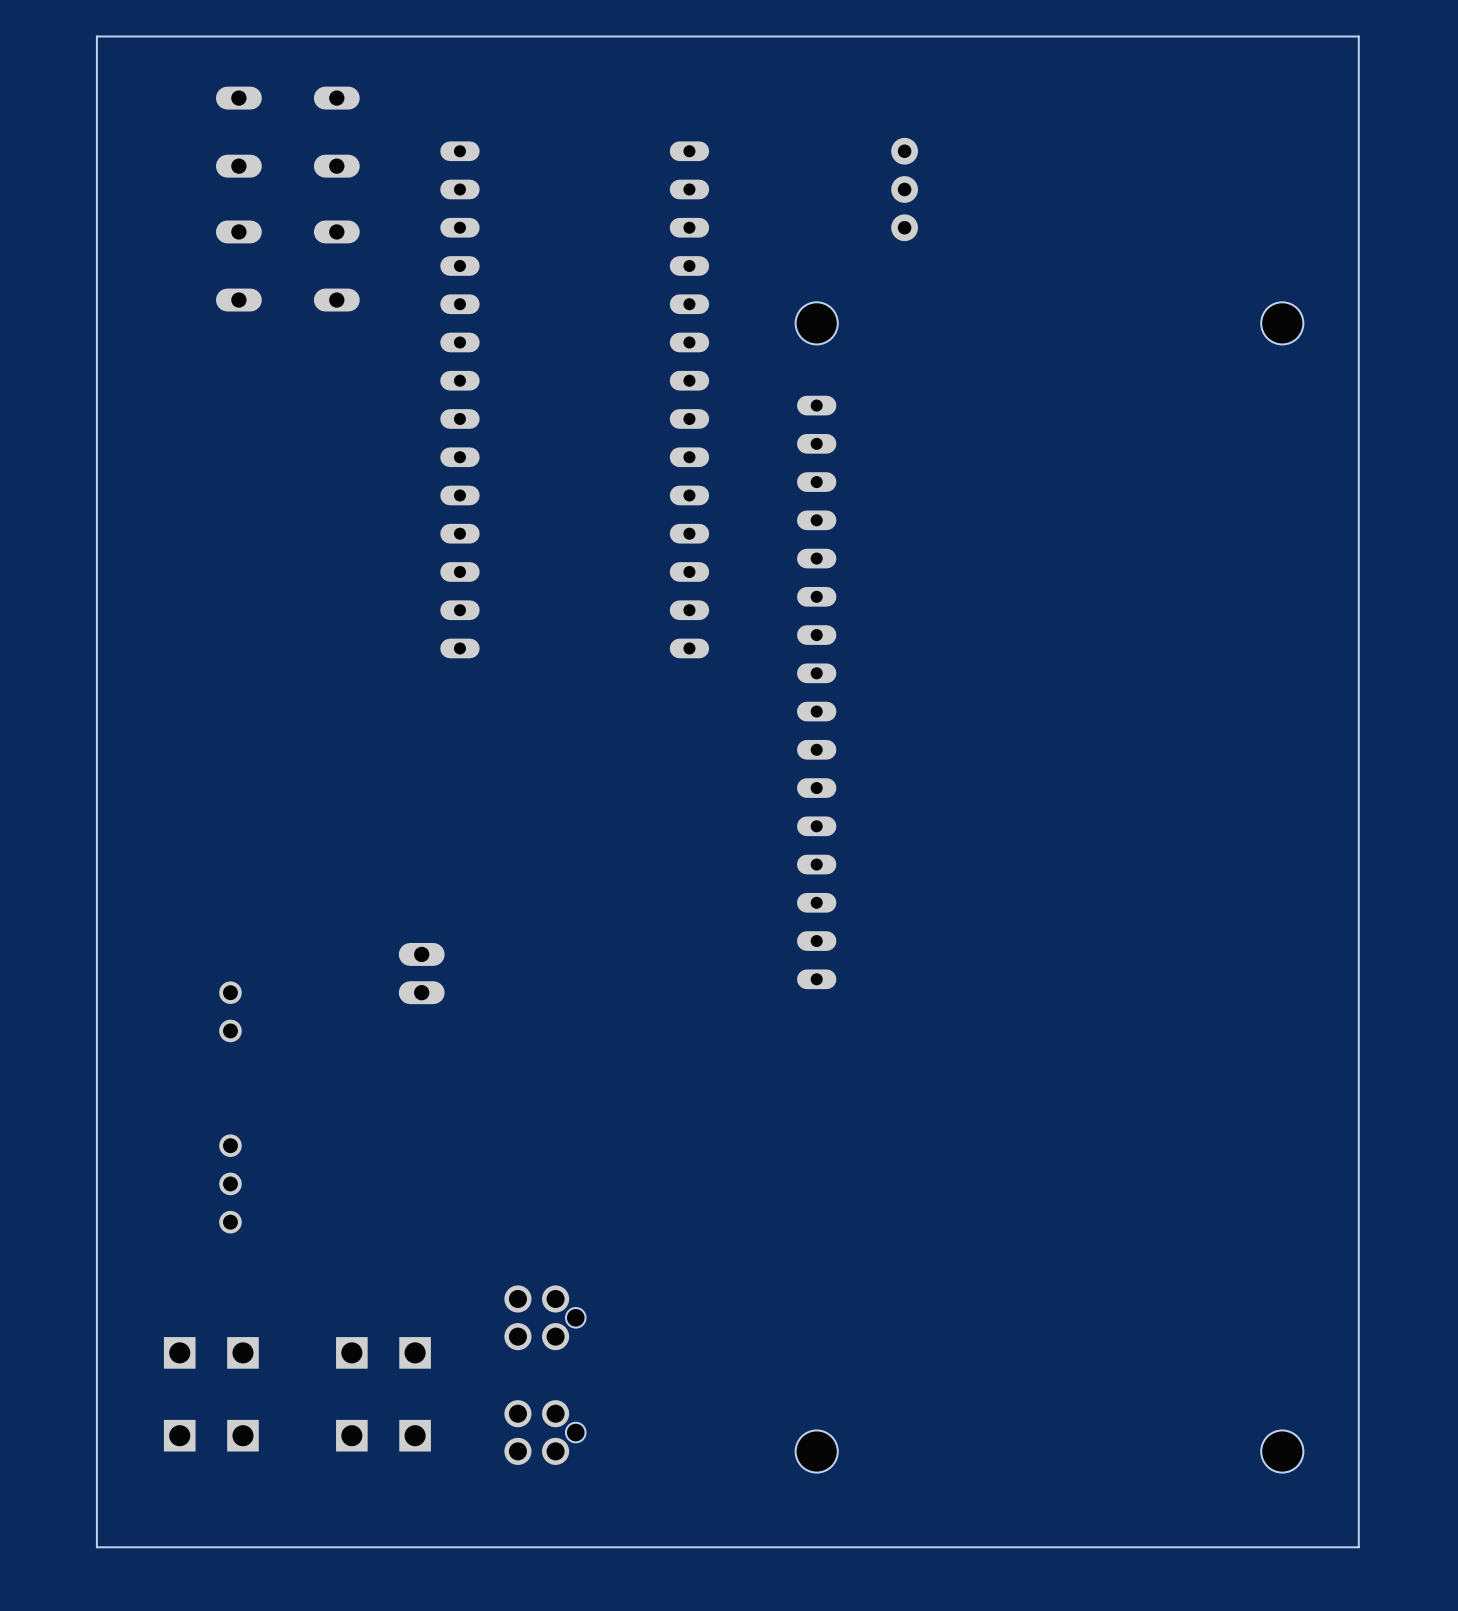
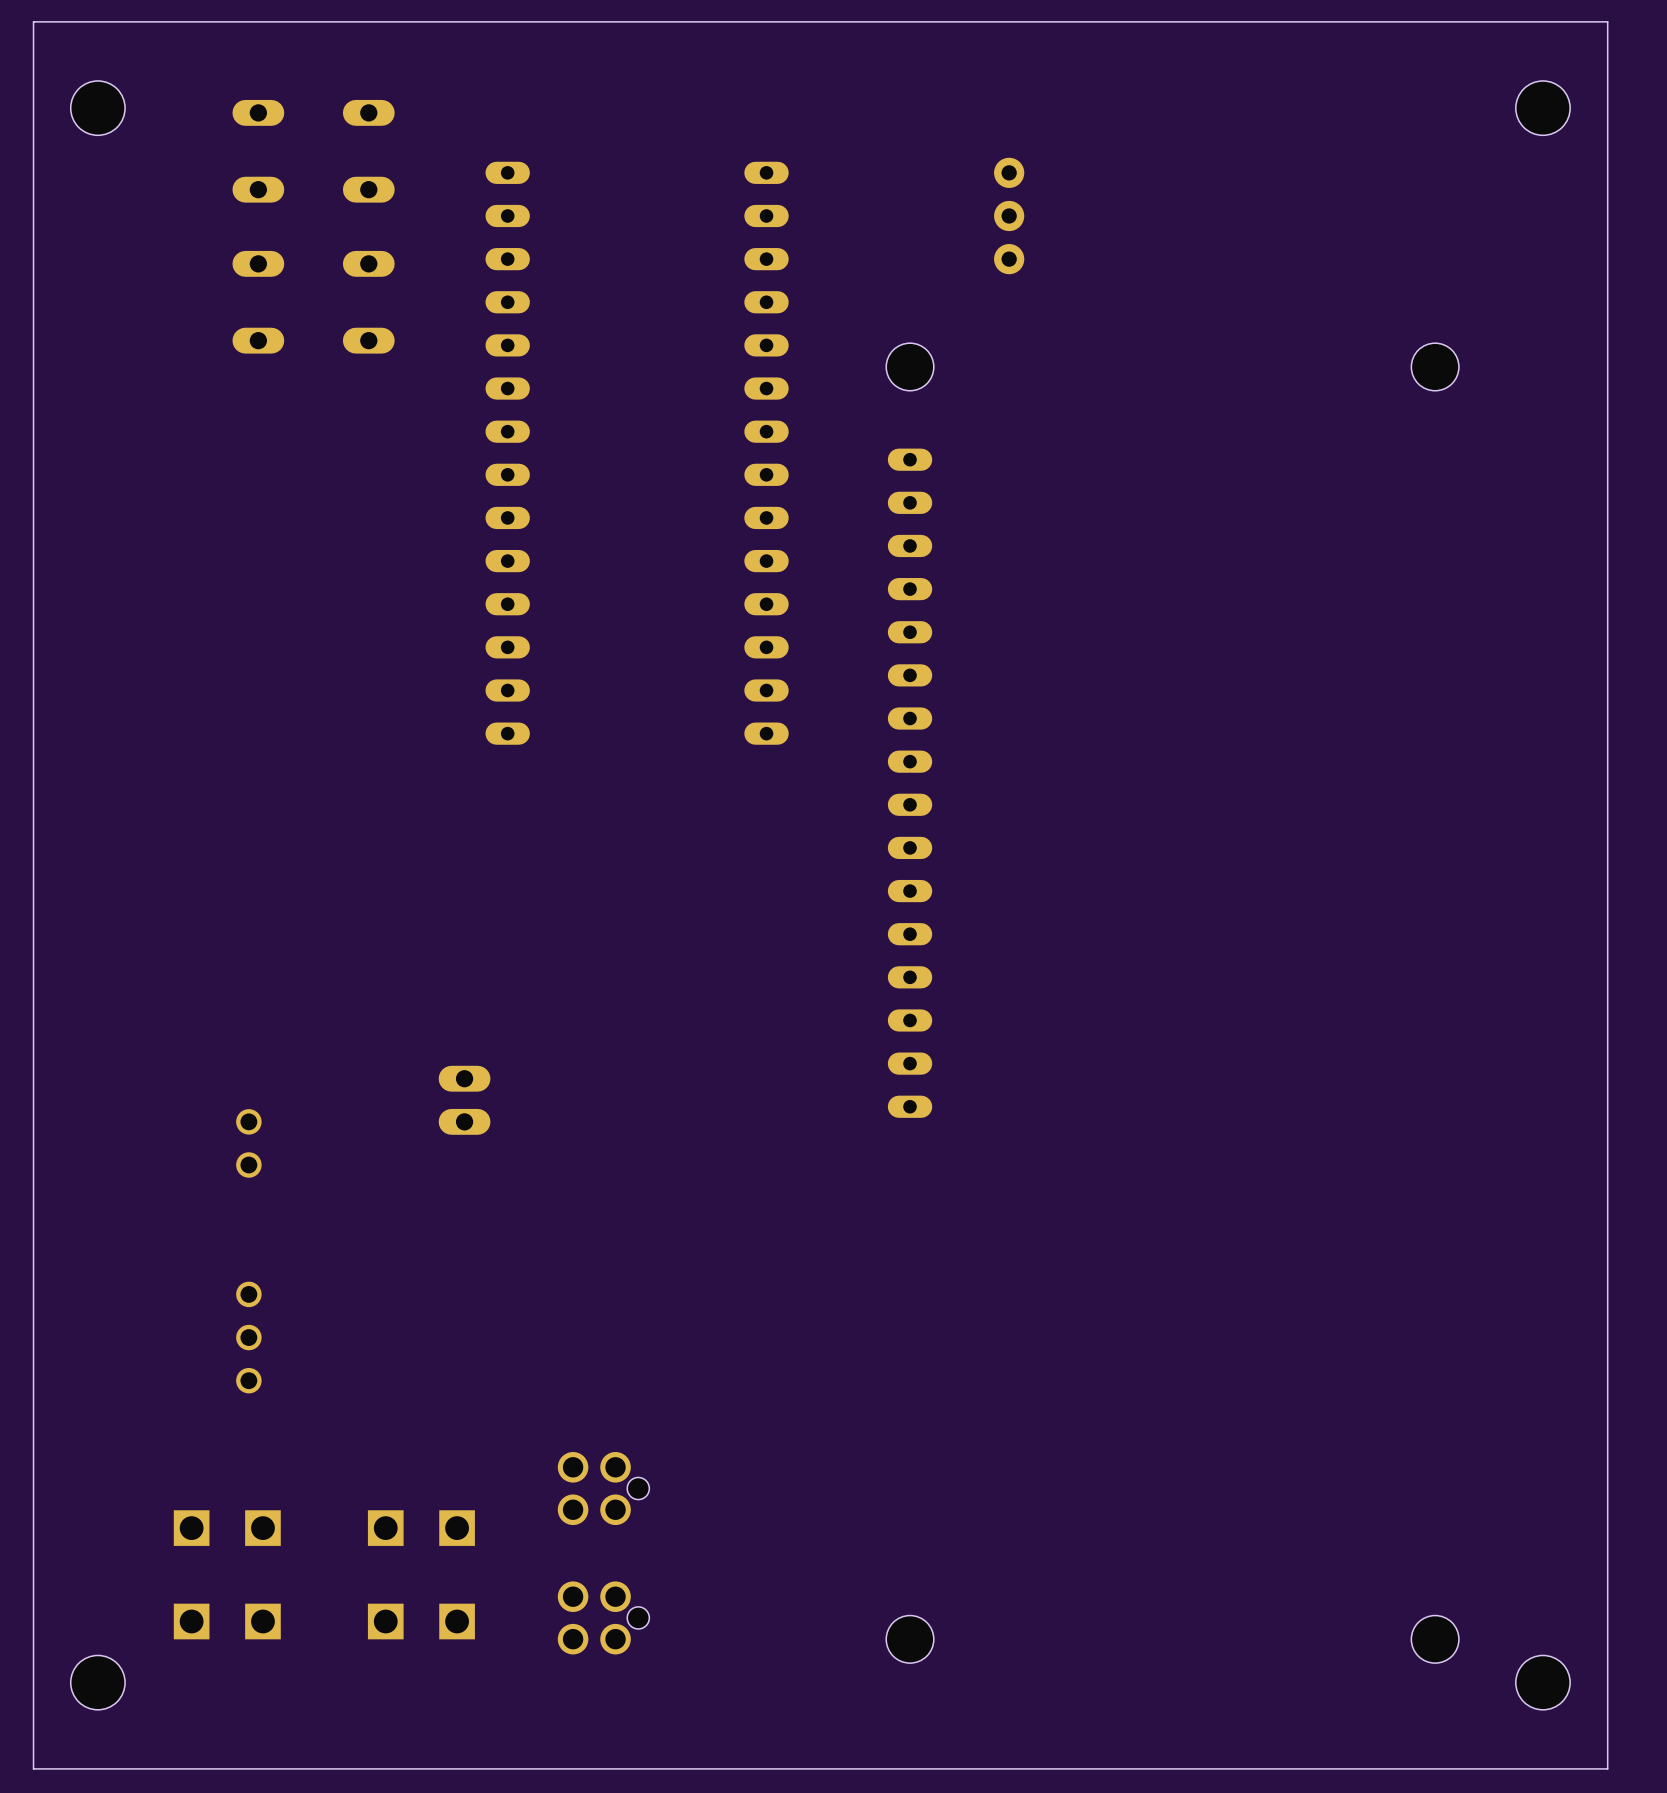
board edge: (1358, 36) (96, 36) (96, 1547) (1358, 1547) (1358, 36) -> (1607, 21) (1607, 1768) (33, 1768) (33, 21) (1607, 21)
hole: none -> (97, 108)
hole: none -> (1542, 108)
hole: none -> (97, 1682)
hole: none -> (1542, 1682)

